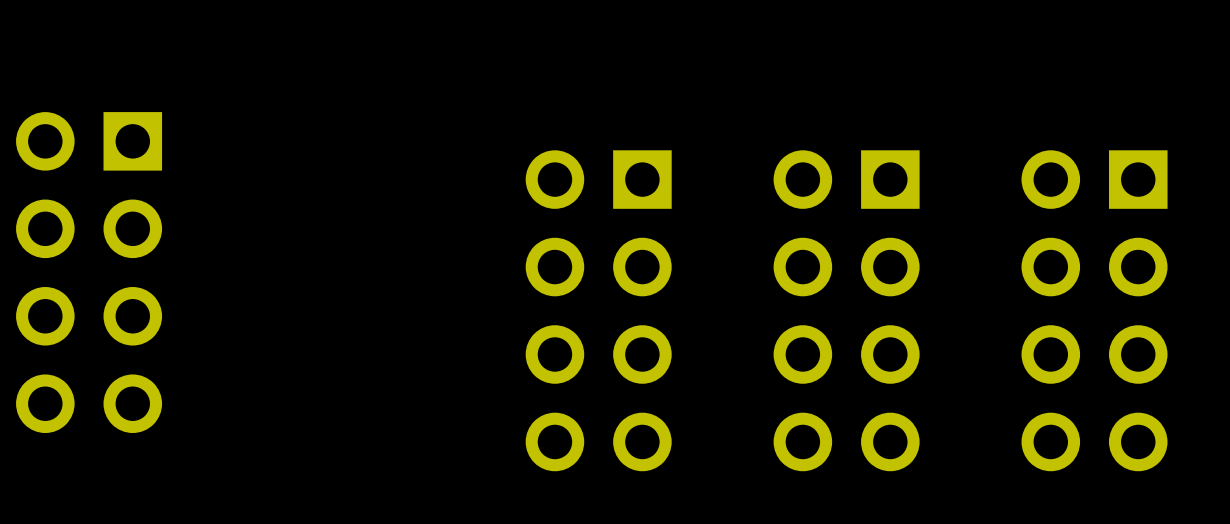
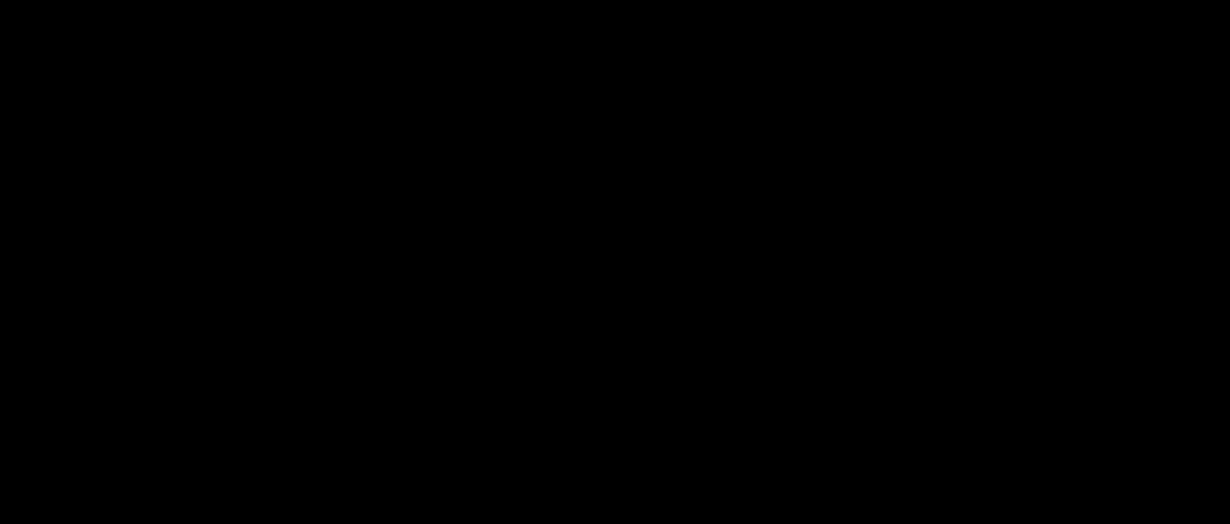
part: (89, 272) -> none
part: (598, 310) -> none
part: (846, 310) -> none
part: (1094, 310) -> none

